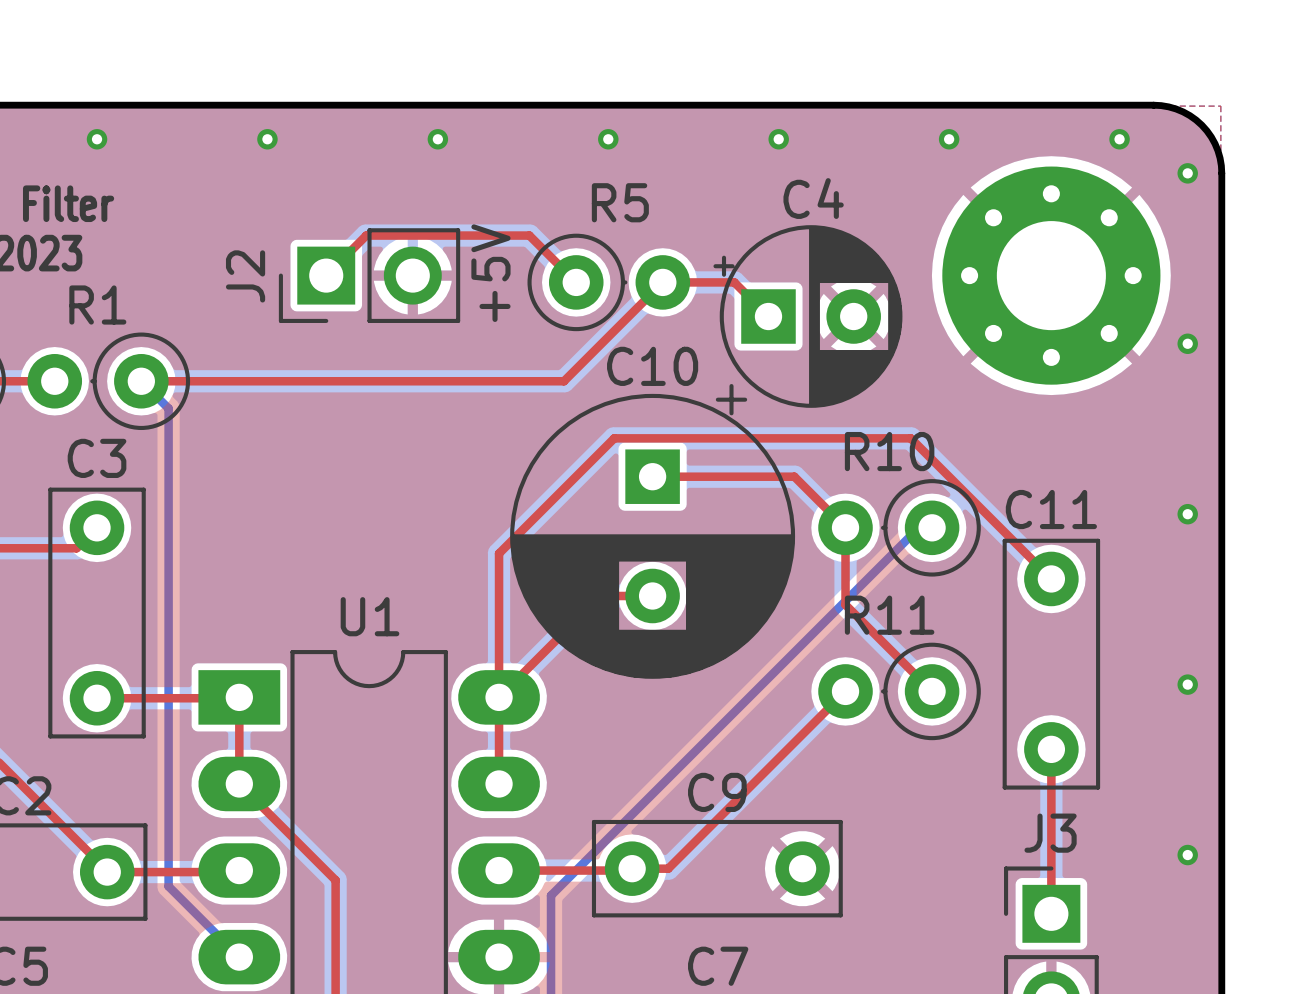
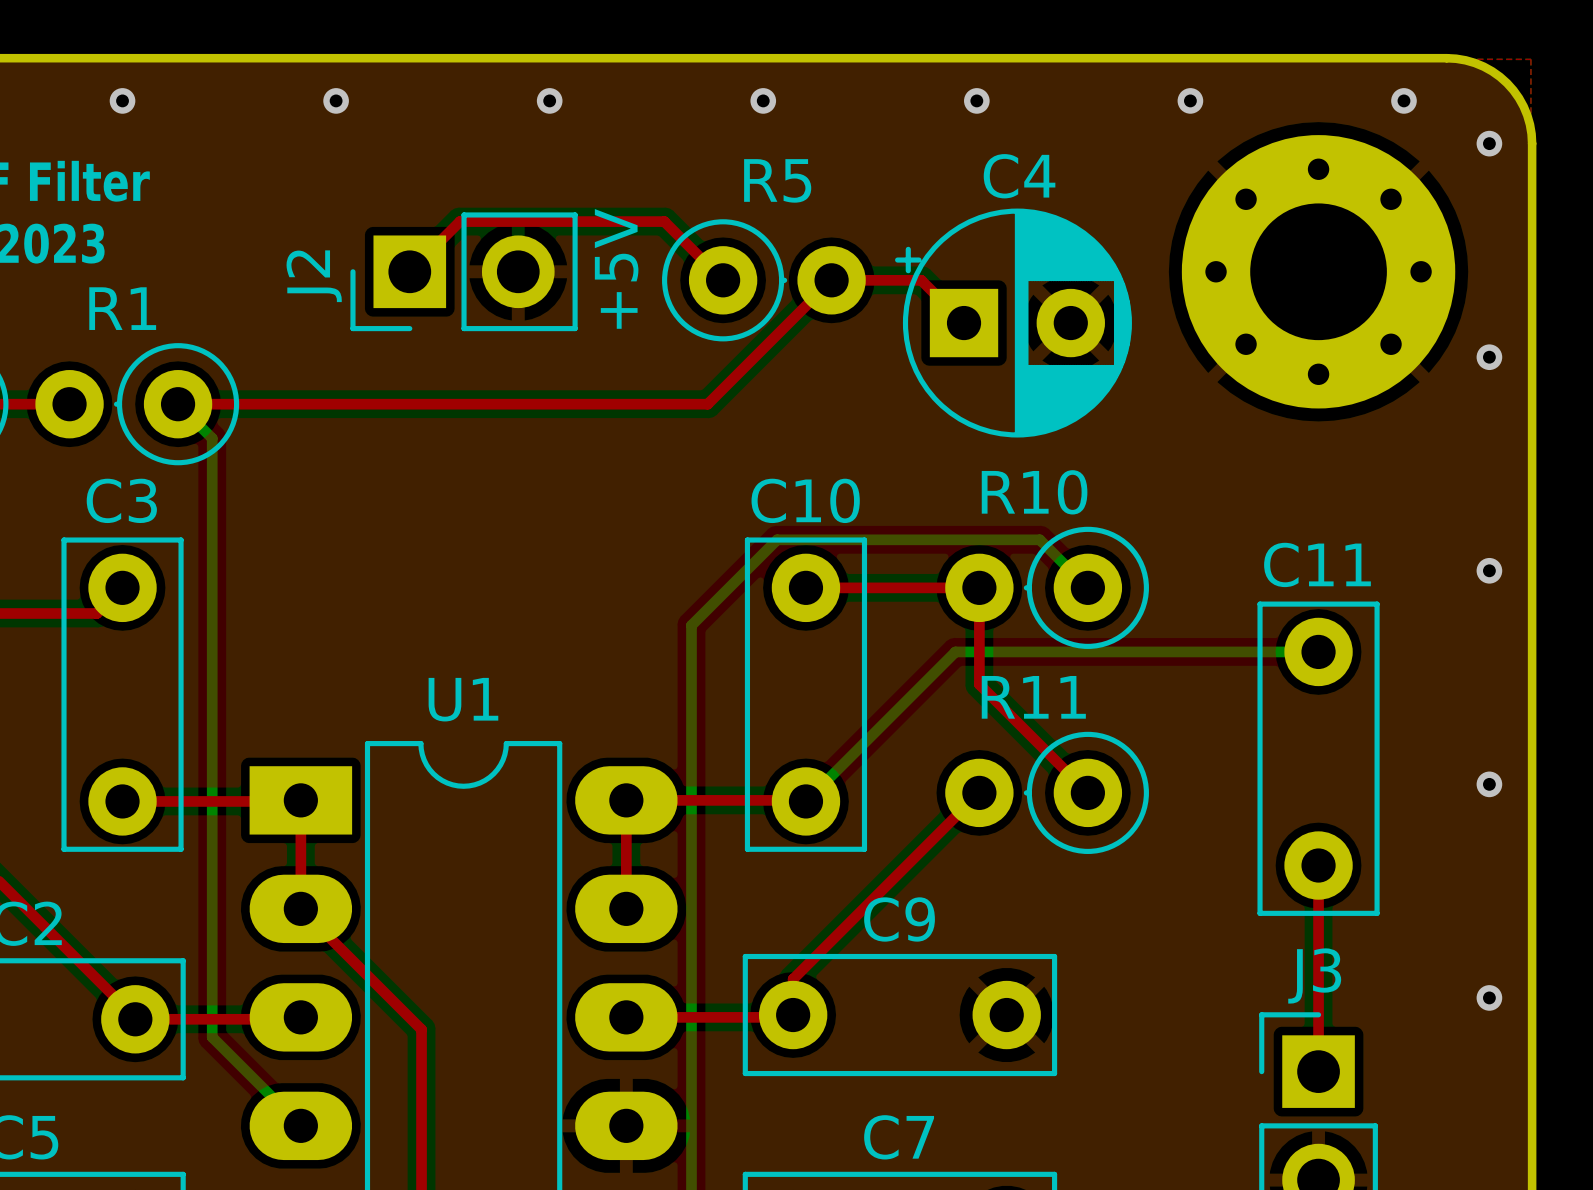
C10 footprint: [510, 384, 796, 679] -> [744, 537, 868, 852]
top track: (652, 476) (794, 476) (845, 527) (845, 604) (932, 691) -> none
top track: none -> (805, 587) (979, 587) (979, 684) (1087, 792)
R10 position: (899, 527) -> (1047, 587)
bottom track: (932, 527) (918, 527) (551, 895) -> (1087, 587) (1039, 539) (777, 539) (691, 625) (691, 1048)
top track: (1051, 578) (910, 438) (614, 438) (499, 553) (499, 697) (600, 595) (652, 595) -> none
bottom track: none -> (1318, 651) (955, 651) (805, 801)
top track: (845, 691) (668, 868) (632, 868) -> (979, 792) (793, 979) (793, 1015)
R11 position: (899, 691) -> (1047, 792)
top track: none -> (626, 800) (805, 801)

